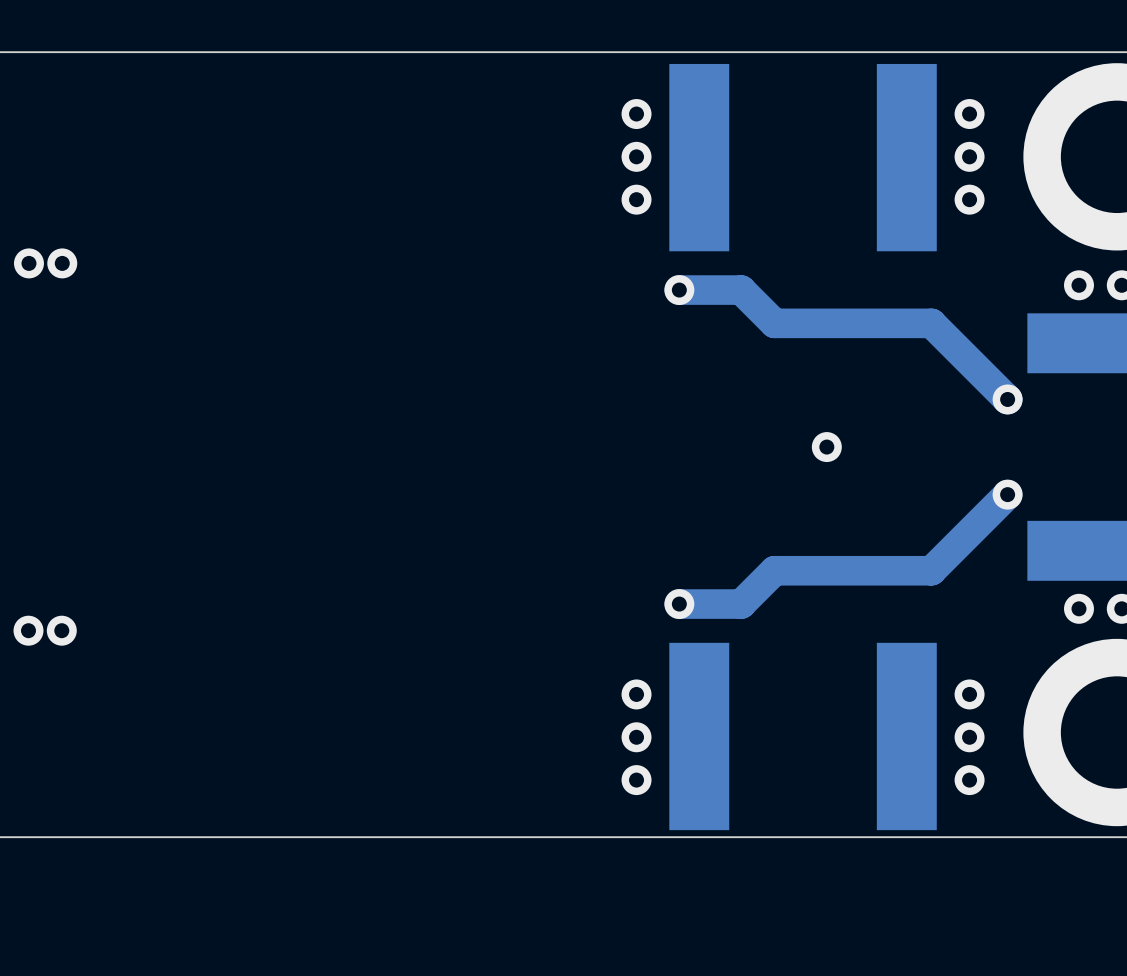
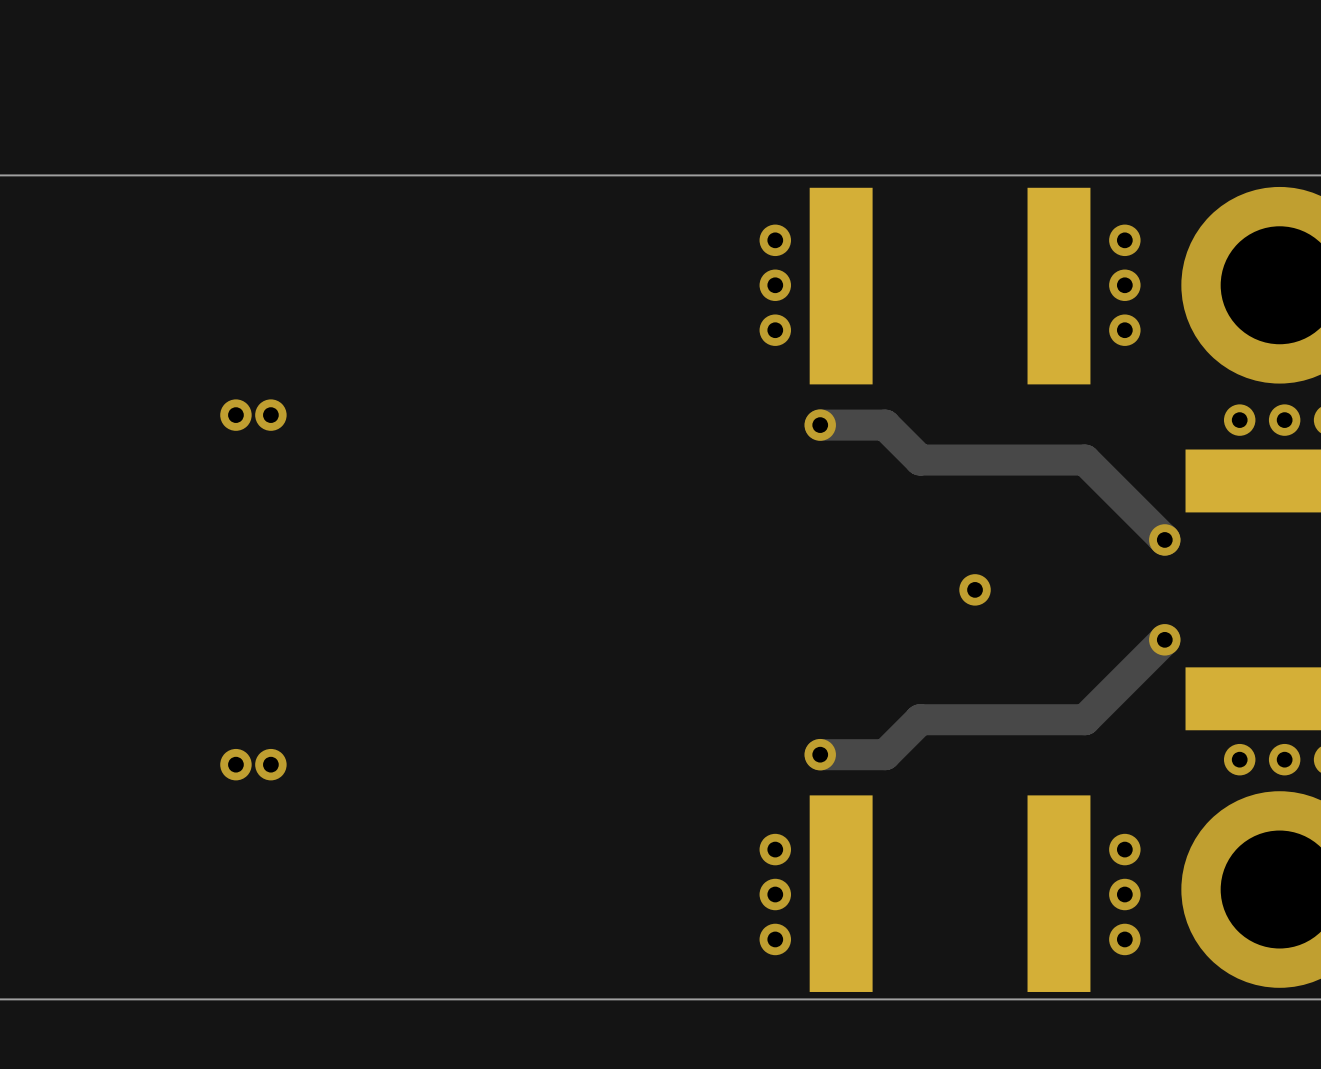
via: (28, 263) -> none
via: (62, 263) -> none
via: none -> (235, 415)
via: none -> (270, 415)
via: none -> (235, 764)
via: none -> (270, 764)
via: (28, 630) -> none
via: (61, 630) -> none

